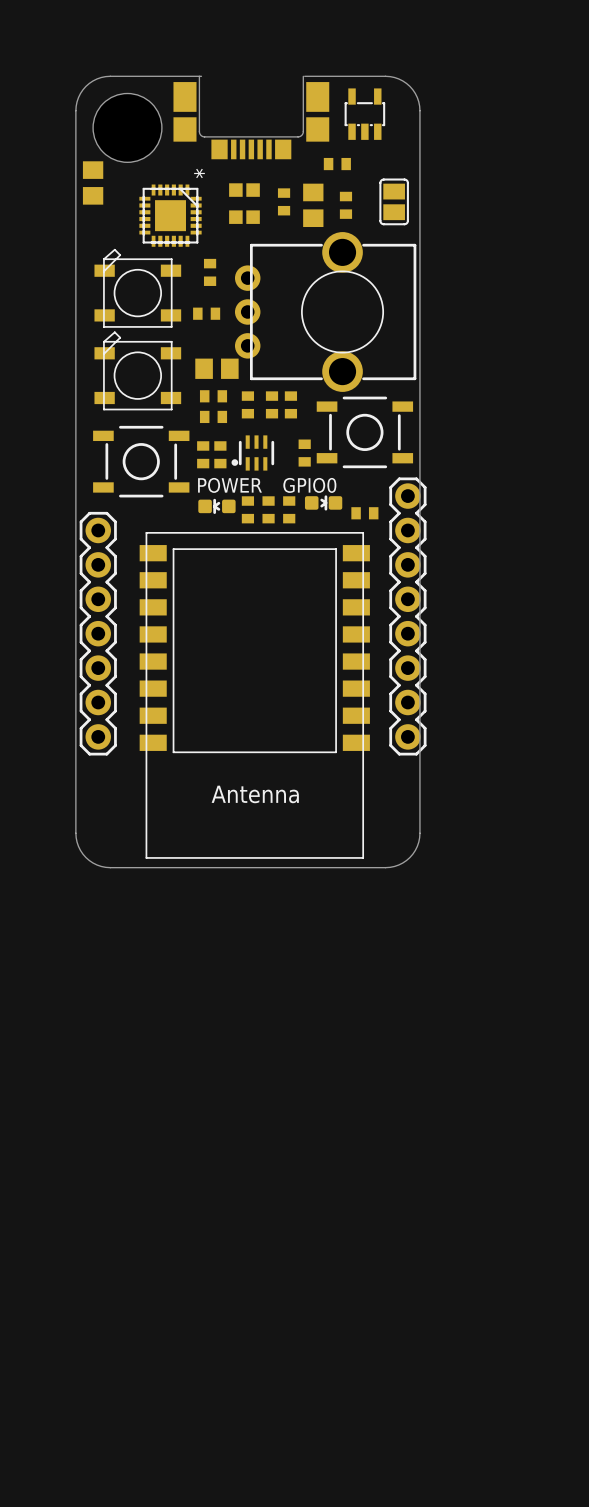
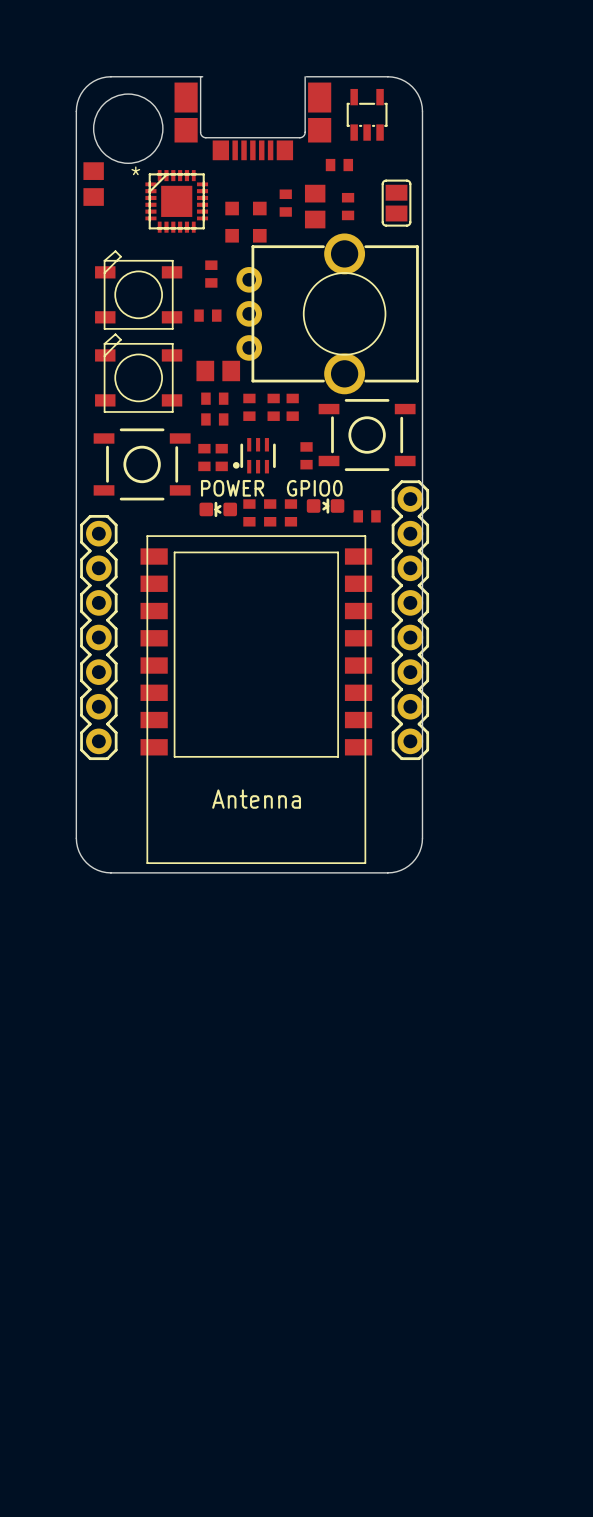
part: (235, 203) -> none
part: (253, 203) -> none
part rotation: 0° (170, 215) -> 90° counterclockwise (176, 201)
part: none -> (232, 222)
part: none -> (259, 222)

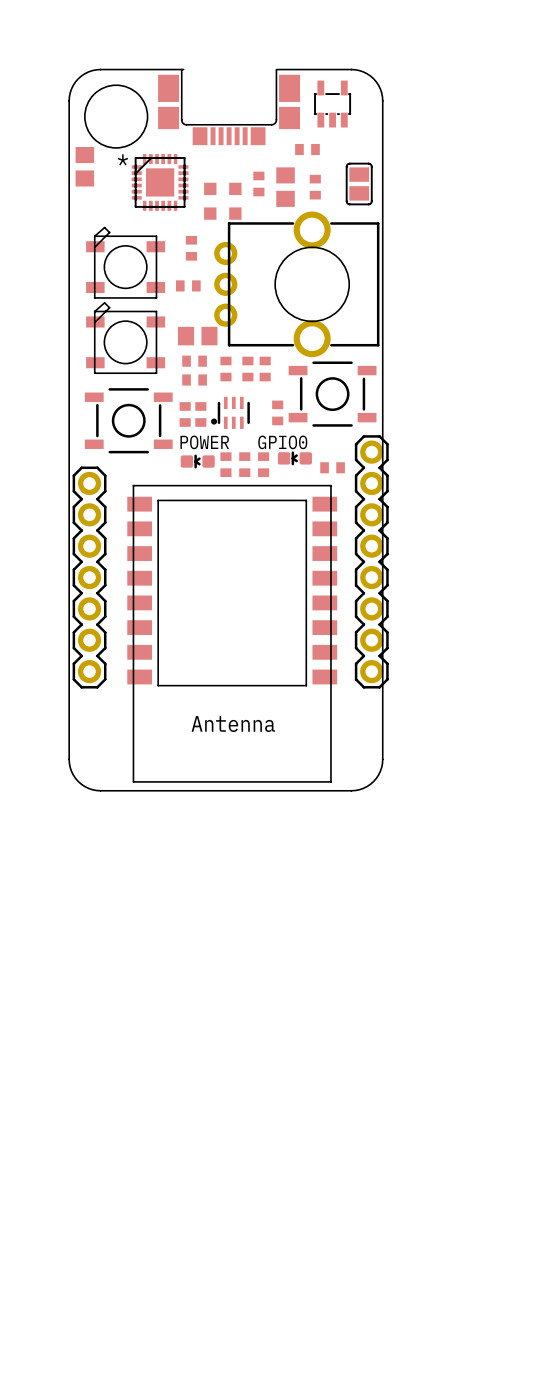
part rotation: 0° (325, 505) -> 180° (294, 458)

